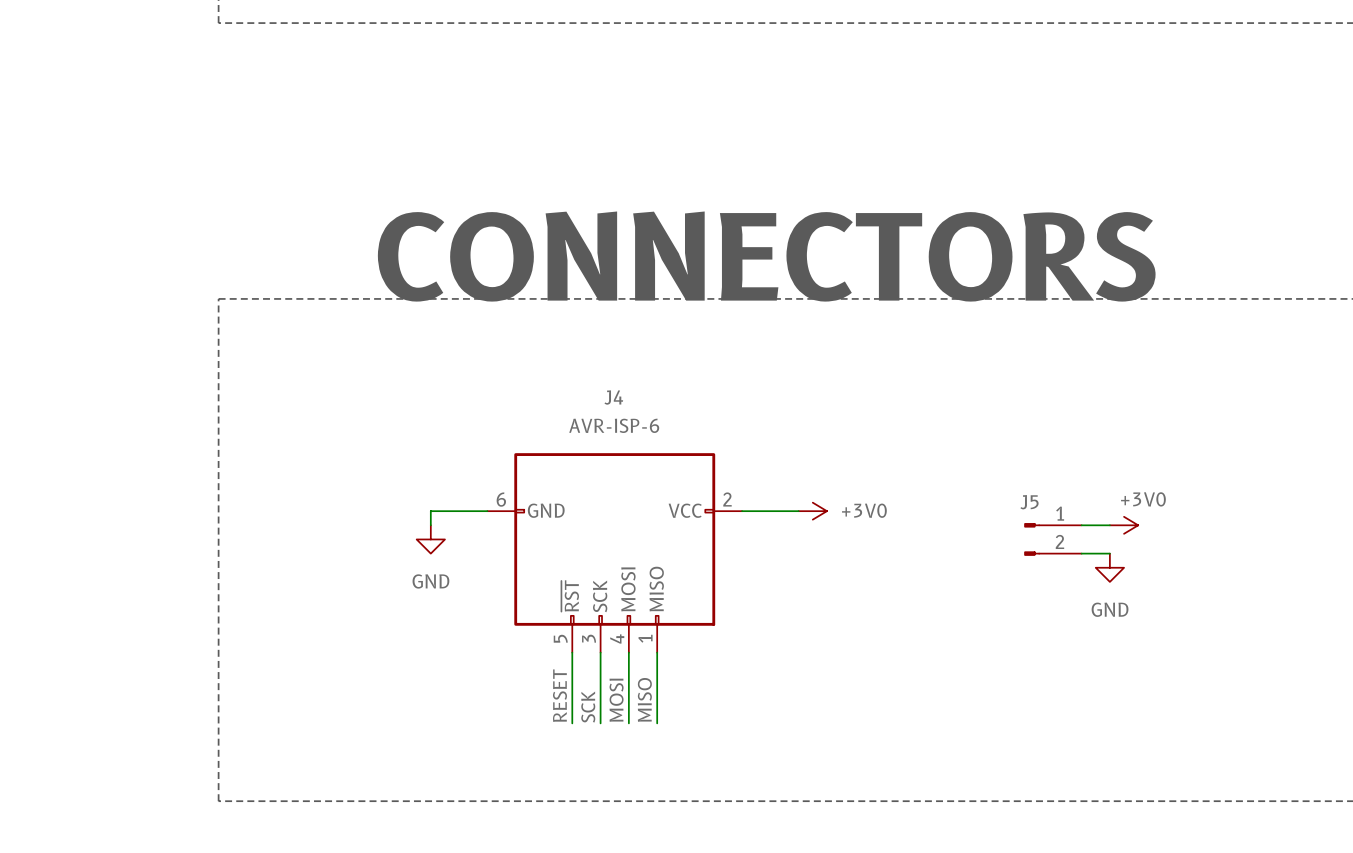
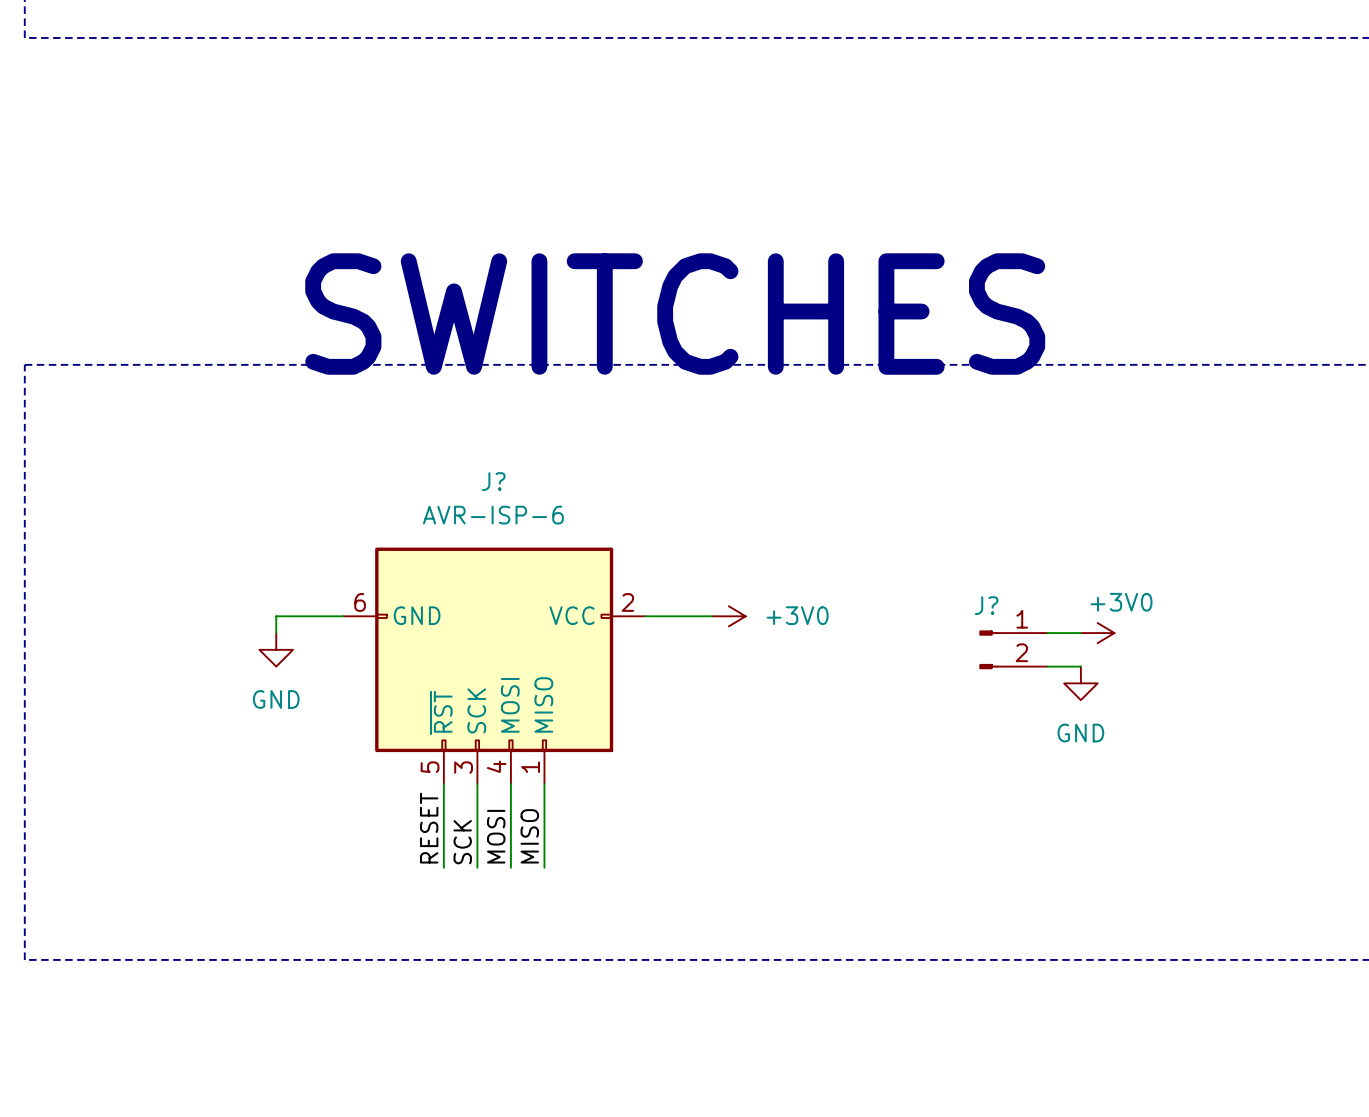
text: CONNECTORS (766, 256) -> SWITCHES (675, 314)
J4 name: J4 (613, 397) -> J? (493, 481)
J5 name: J5 (1029, 502) -> J? (986, 605)

